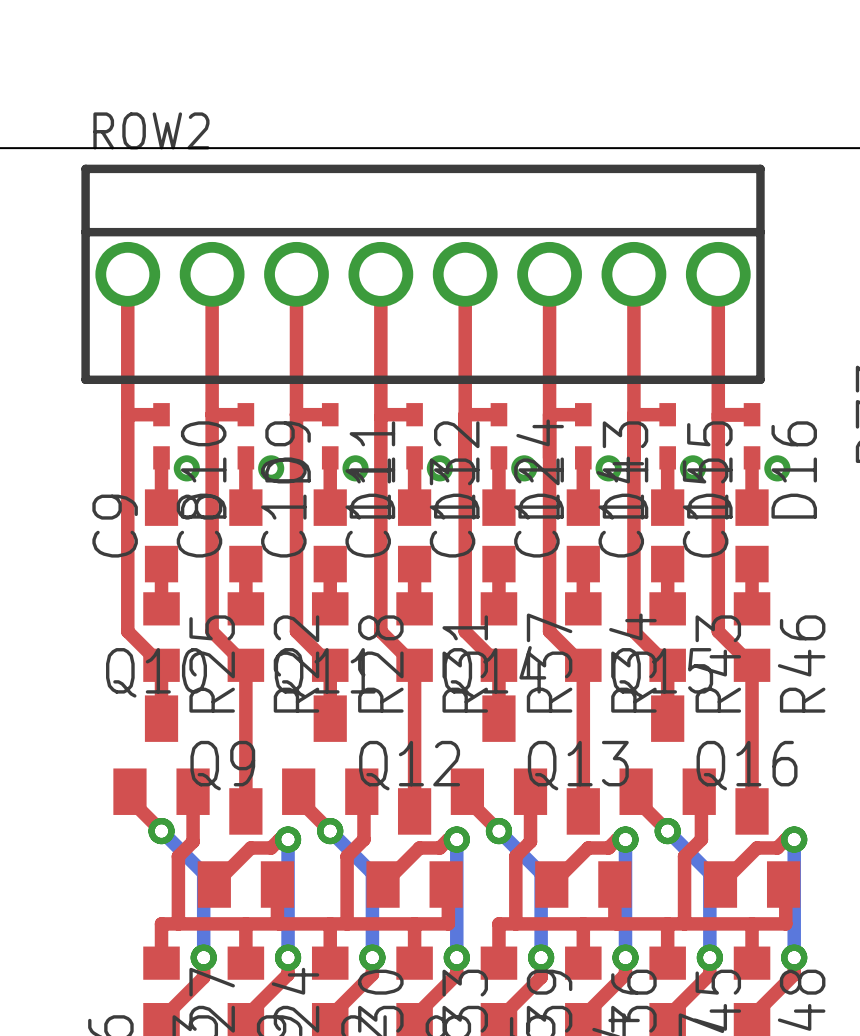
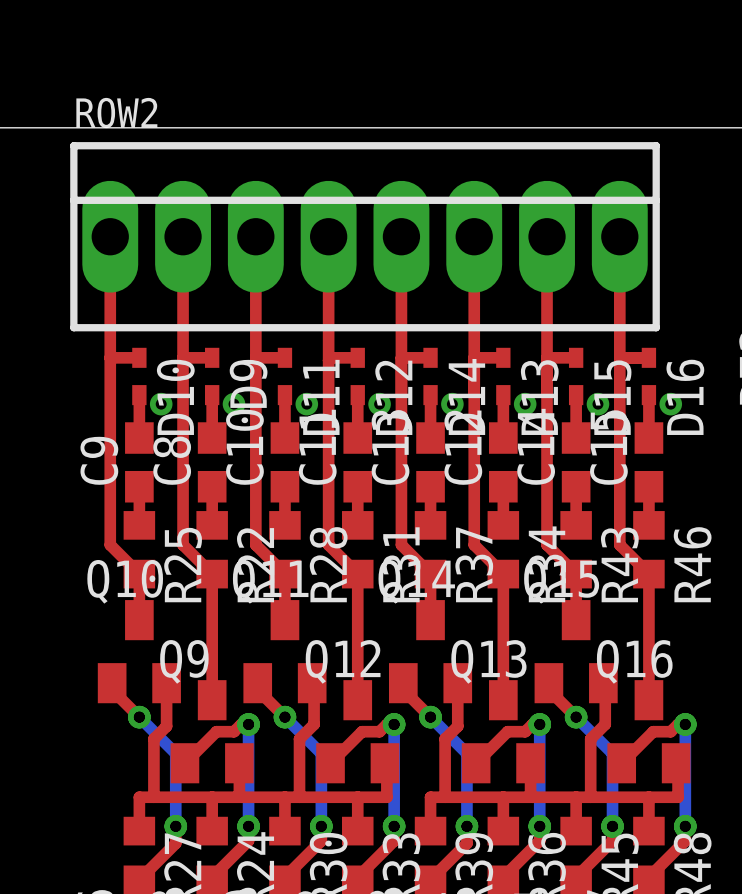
ROW2 footprint: [81, 164, 765, 385] -> [70, 142, 660, 332]

